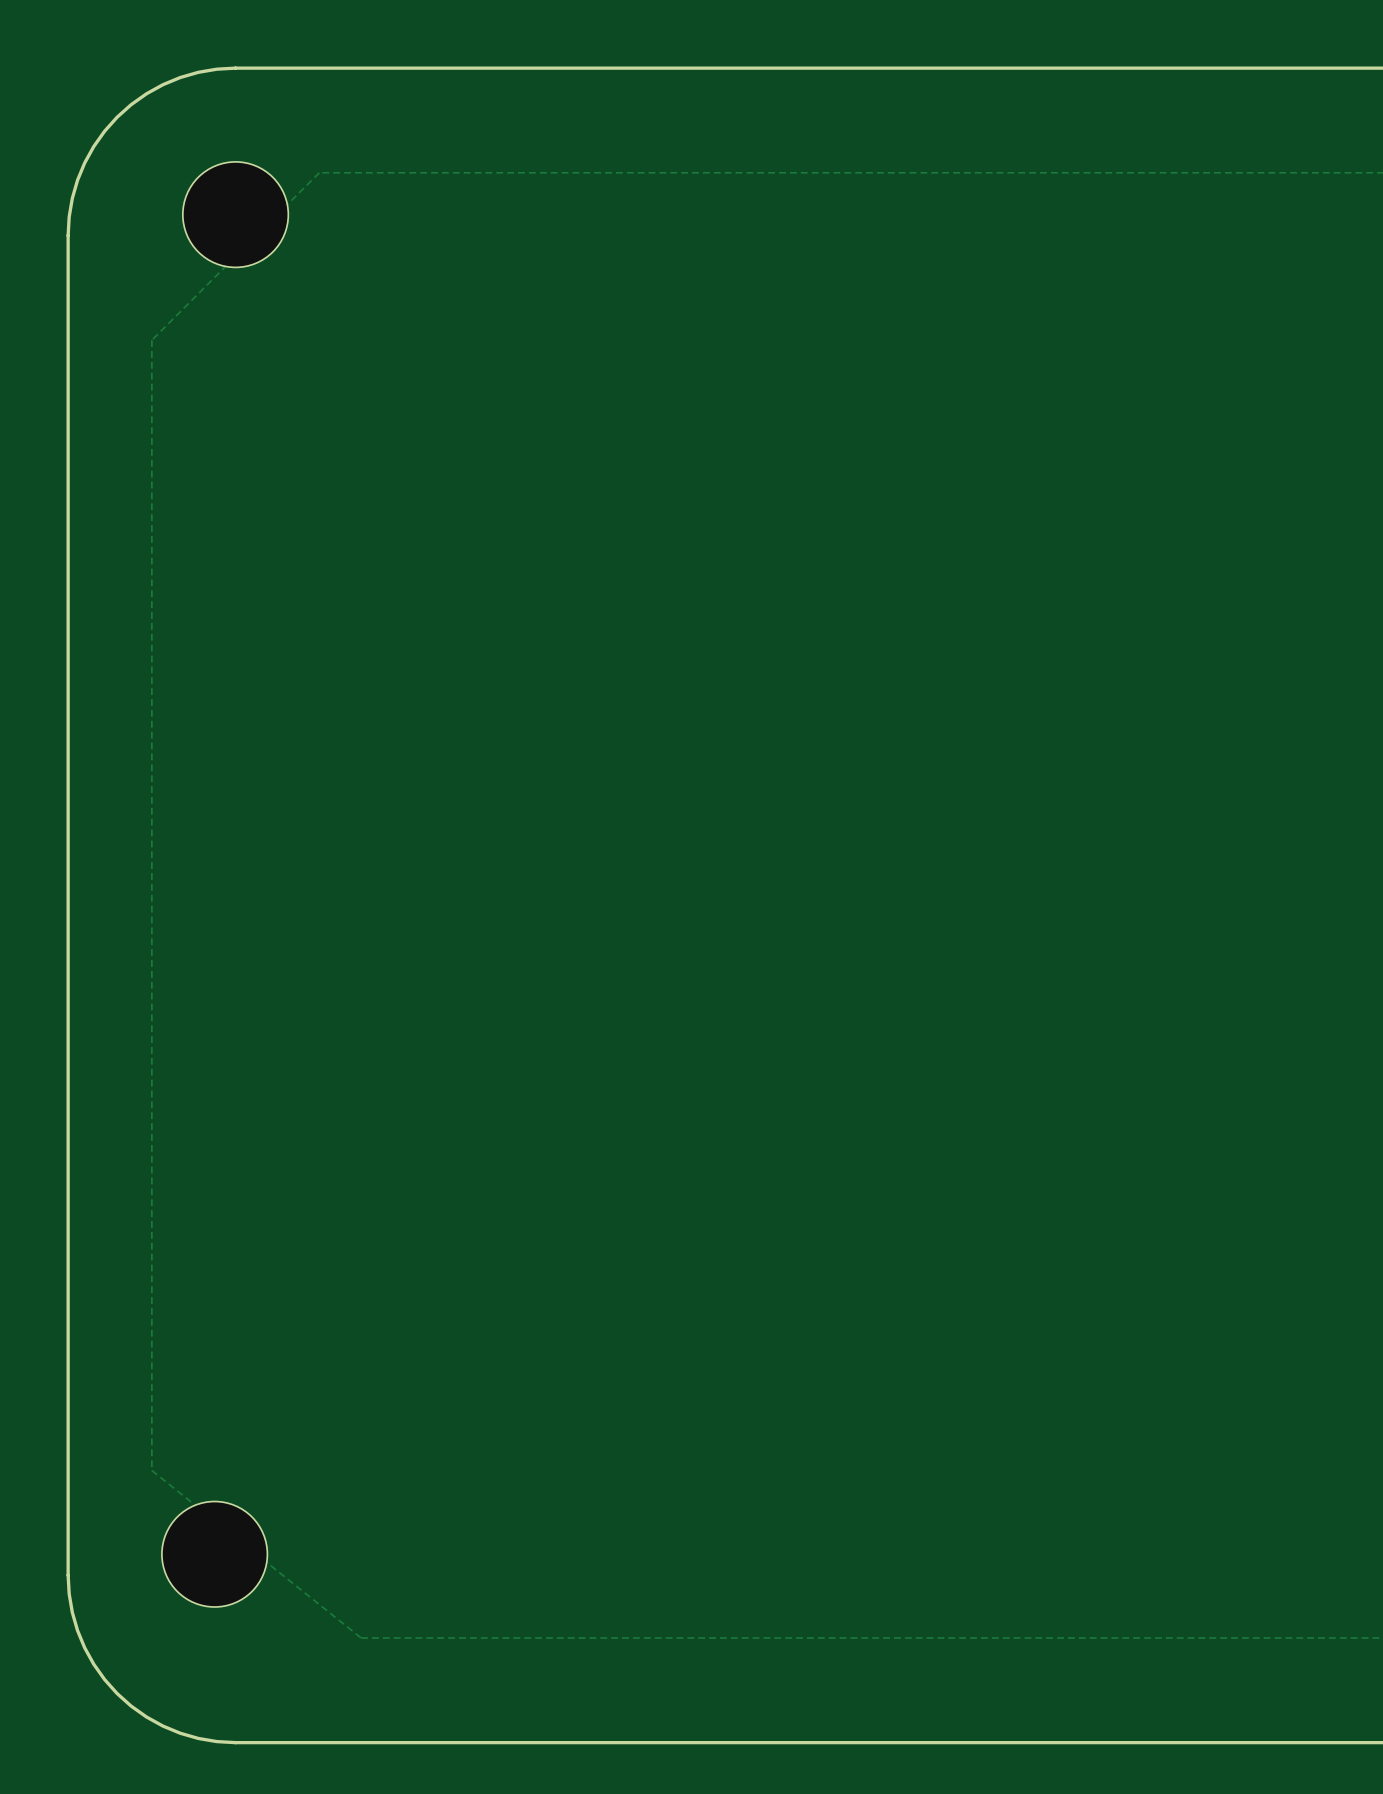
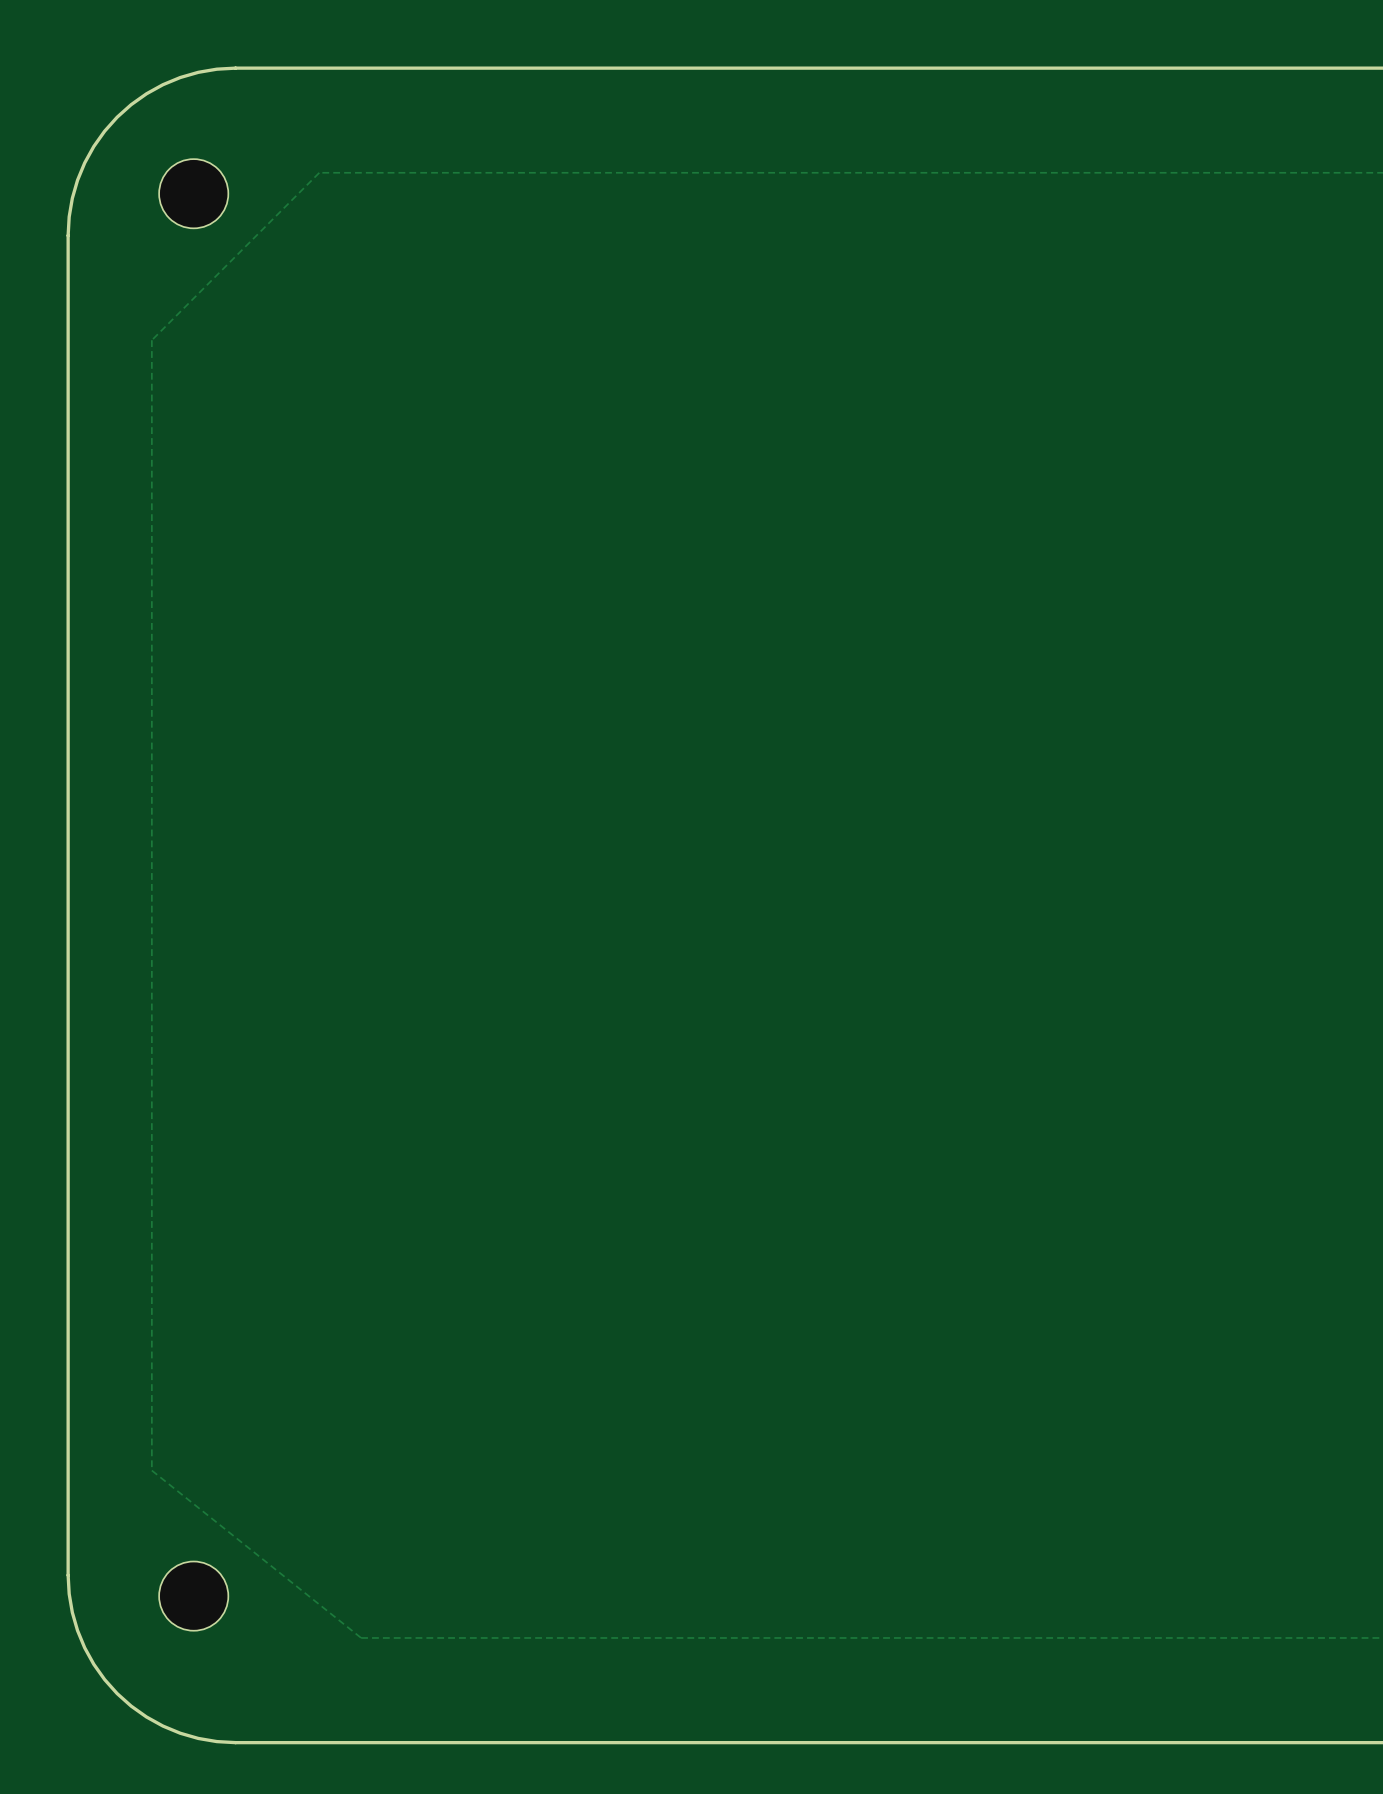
part: none -> (193, 193)
part: (235, 214) -> none
part: (214, 1554) -> none
part: none -> (193, 1596)

